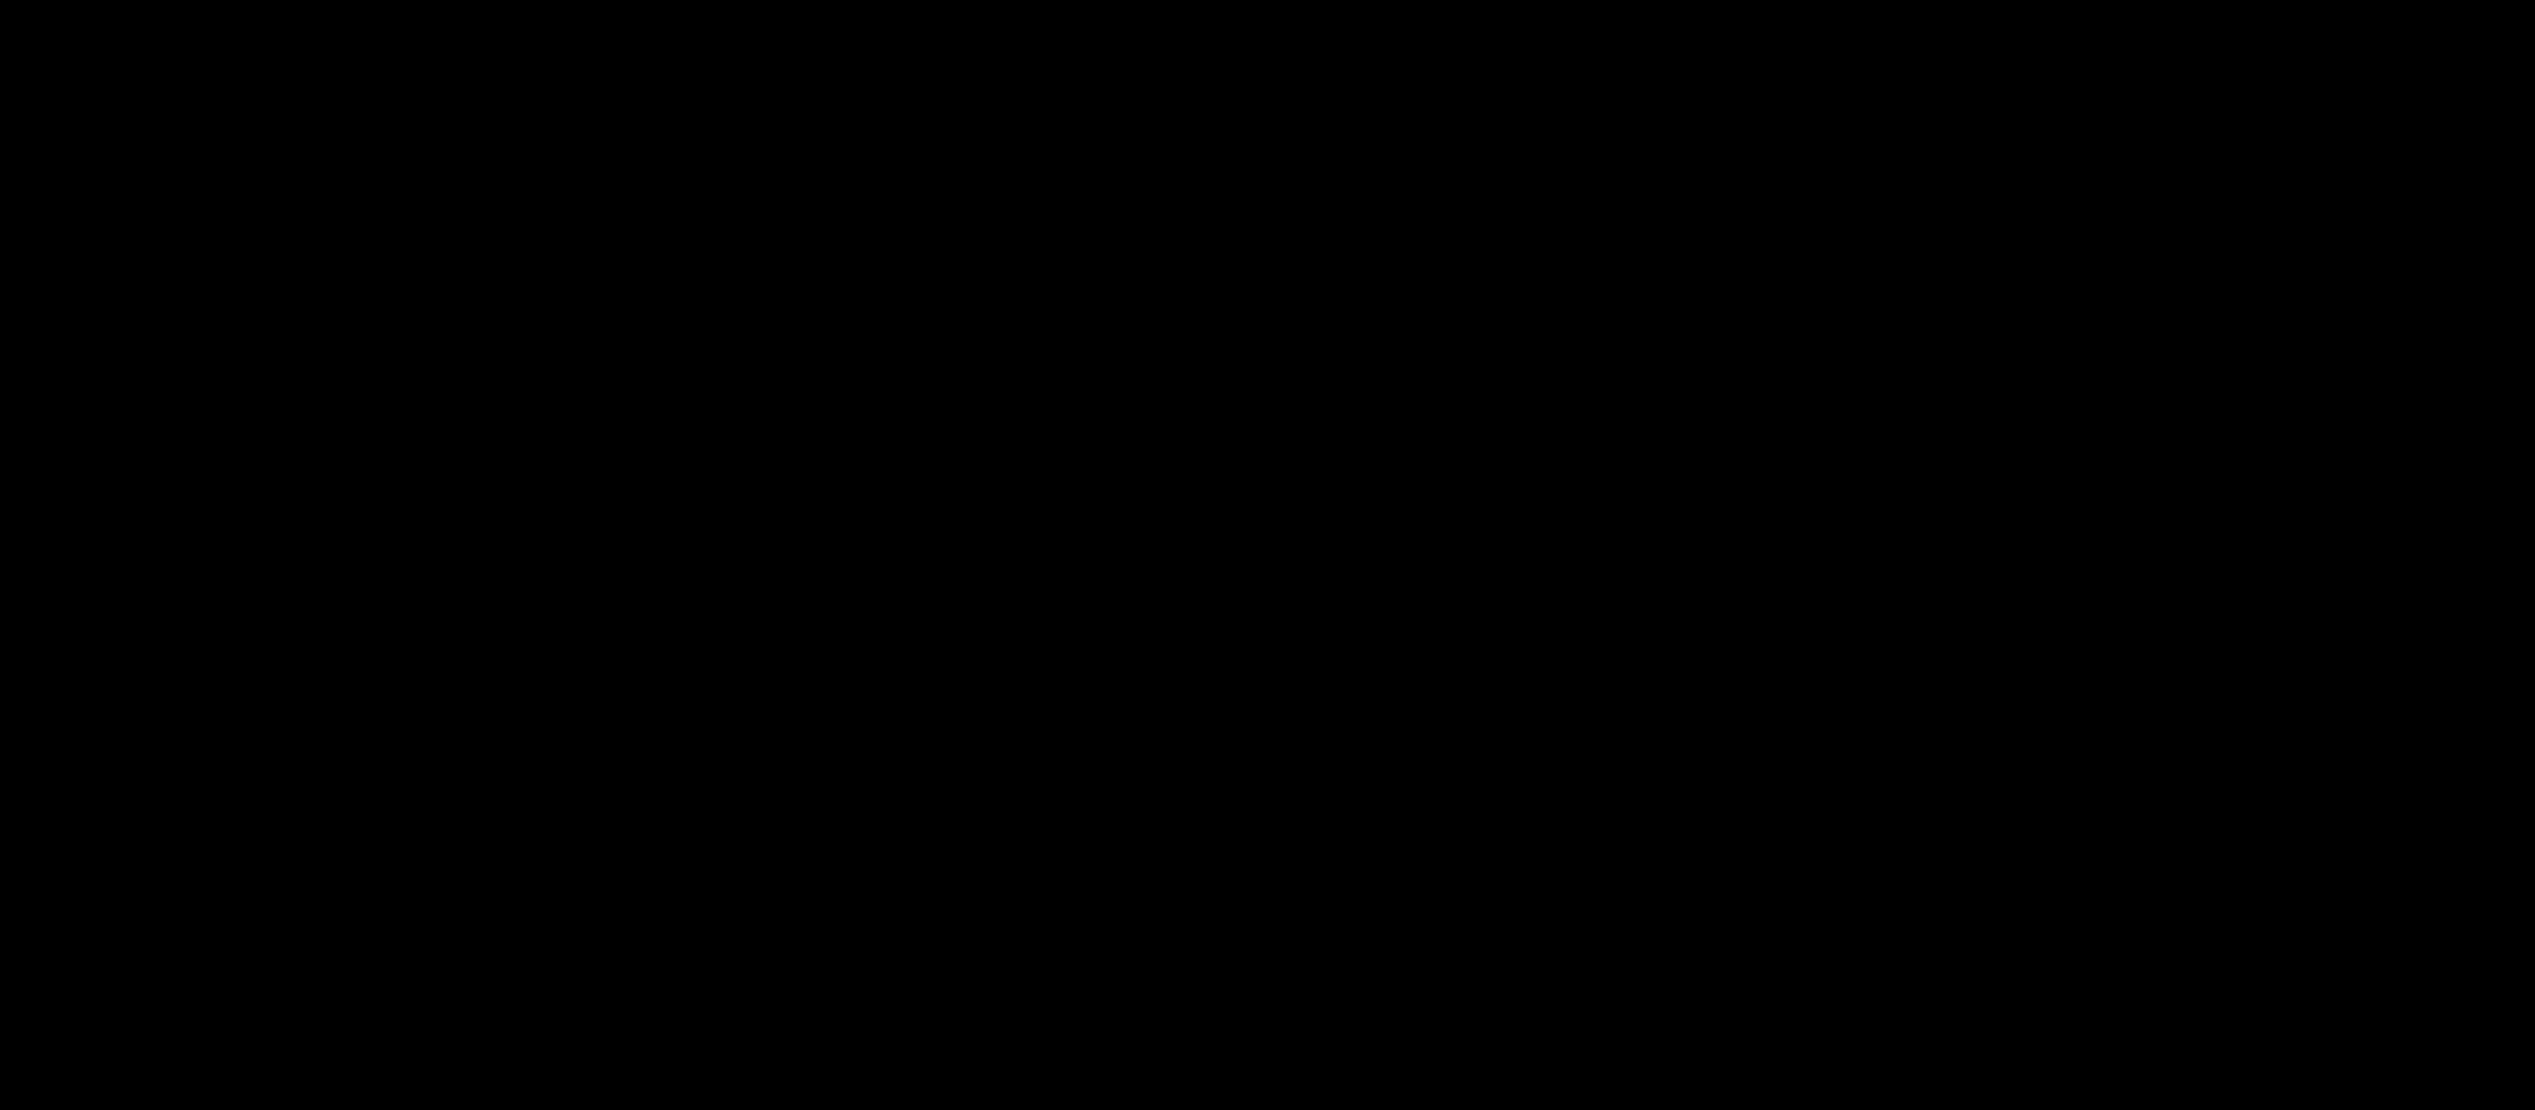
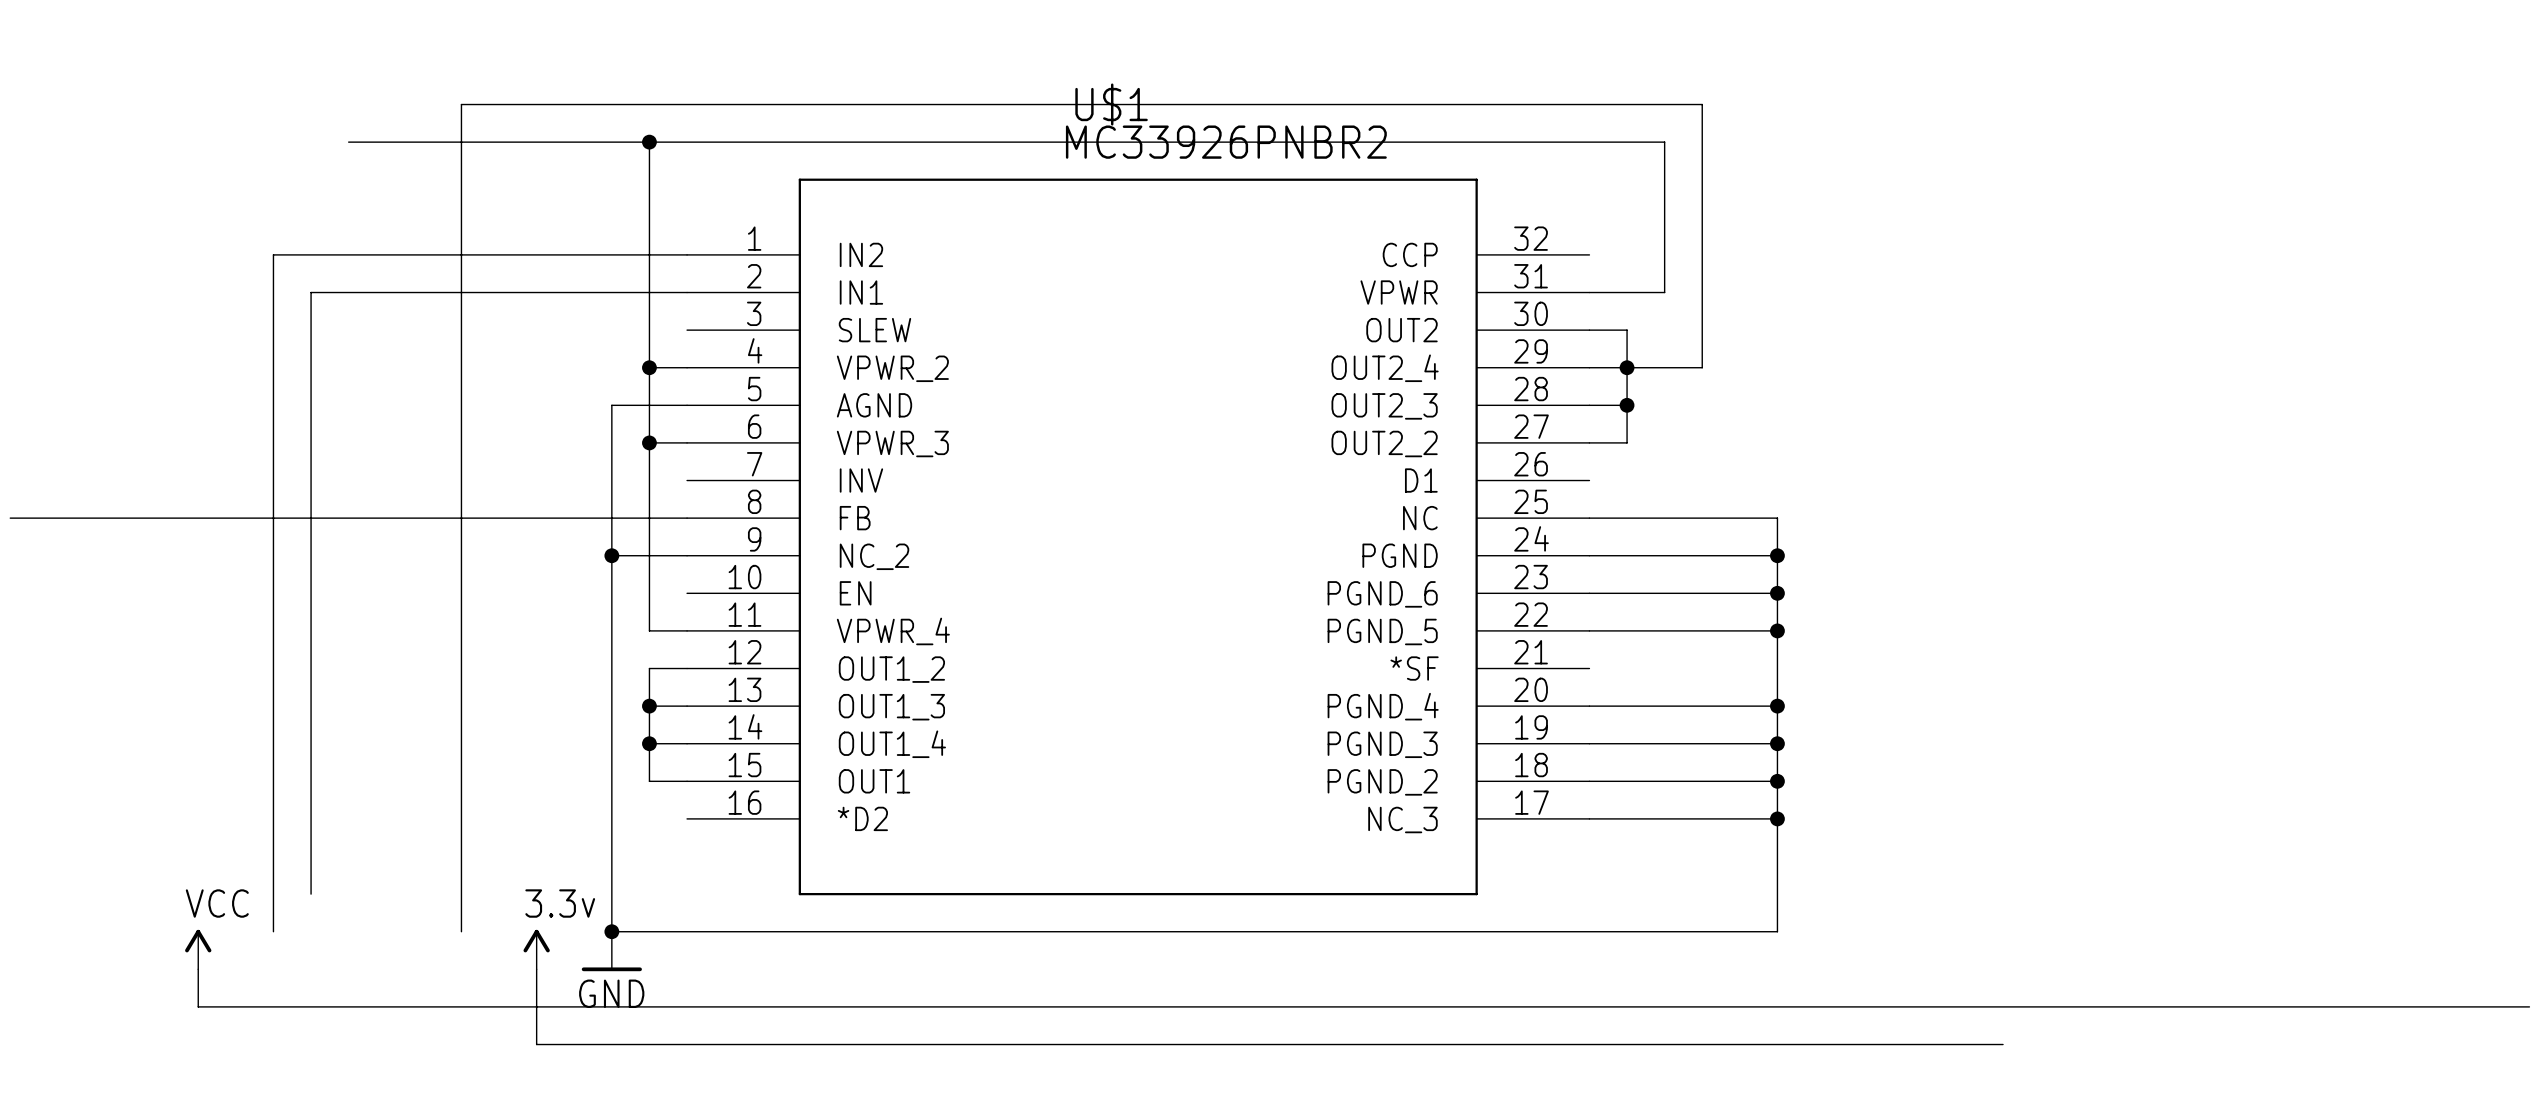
wire: none -> (348, 142) (1664, 142) (1664, 292) (1589, 292)
wire: none -> (649, 142) (649, 630) (687, 630)
junction: none -> (649, 142)
wire: none -> (687, 254) (273, 254) (273, 931)
wire: none -> (687, 292) (311, 292) (311, 894)
wire: none -> (1589, 330) (1627, 330) (1627, 442) (1589, 442)
wire: none -> (649, 367) (687, 367)
junction: none -> (649, 367)
wire: none -> (1589, 367) (1702, 367) (1702, 104) (461, 104) (461, 931)
junction: none -> (1627, 367)
wire: none -> (687, 405) (611, 405) (611, 931) (1777, 931) (1777, 518) (1589, 518)
wire: none -> (1589, 405) (1627, 405)
junction: none -> (1627, 405)
wire: none -> (649, 442) (687, 442)
junction: none -> (649, 442)
wire: none -> (10, 518) (687, 518)
U$1: none -> MC33926PNBR2 (1138, 536)
wire: none -> (611, 555) (687, 555)
junction: none -> (611, 555)
wire: none -> (1589, 555) (1777, 555)
junction: none -> (1777, 555)
wire: none -> (1589, 593) (1777, 593)
junction: none -> (1777, 593)
wire: none -> (1589, 630) (1777, 630)
junction: none -> (1777, 630)
wire: none -> (687, 668) (649, 668) (649, 781) (687, 781)
wire: none -> (649, 706) (687, 706)
junction: none -> (649, 706)
wire: none -> (1589, 706) (1777, 706)
junction: none -> (1777, 706)
wire: none -> (649, 743) (687, 743)
junction: none -> (649, 743)
wire: none -> (1589, 743) (1777, 743)
junction: none -> (1777, 743)
wire: none -> (1589, 781) (1777, 781)
junction: none -> (1777, 781)
wire: none -> (1589, 818) (1777, 818)
junction: none -> (1777, 818)
junction: none -> (611, 931)
power symbol: none -> VCC (198, 949)
power symbol: none -> 3.3v (536, 949)
power symbol: none -> GND (611, 951)
wire: none -> (198, 969) (198, 1006) (2529, 1006)
wire: none -> (536, 969) (536, 1044) (2003, 1044)

